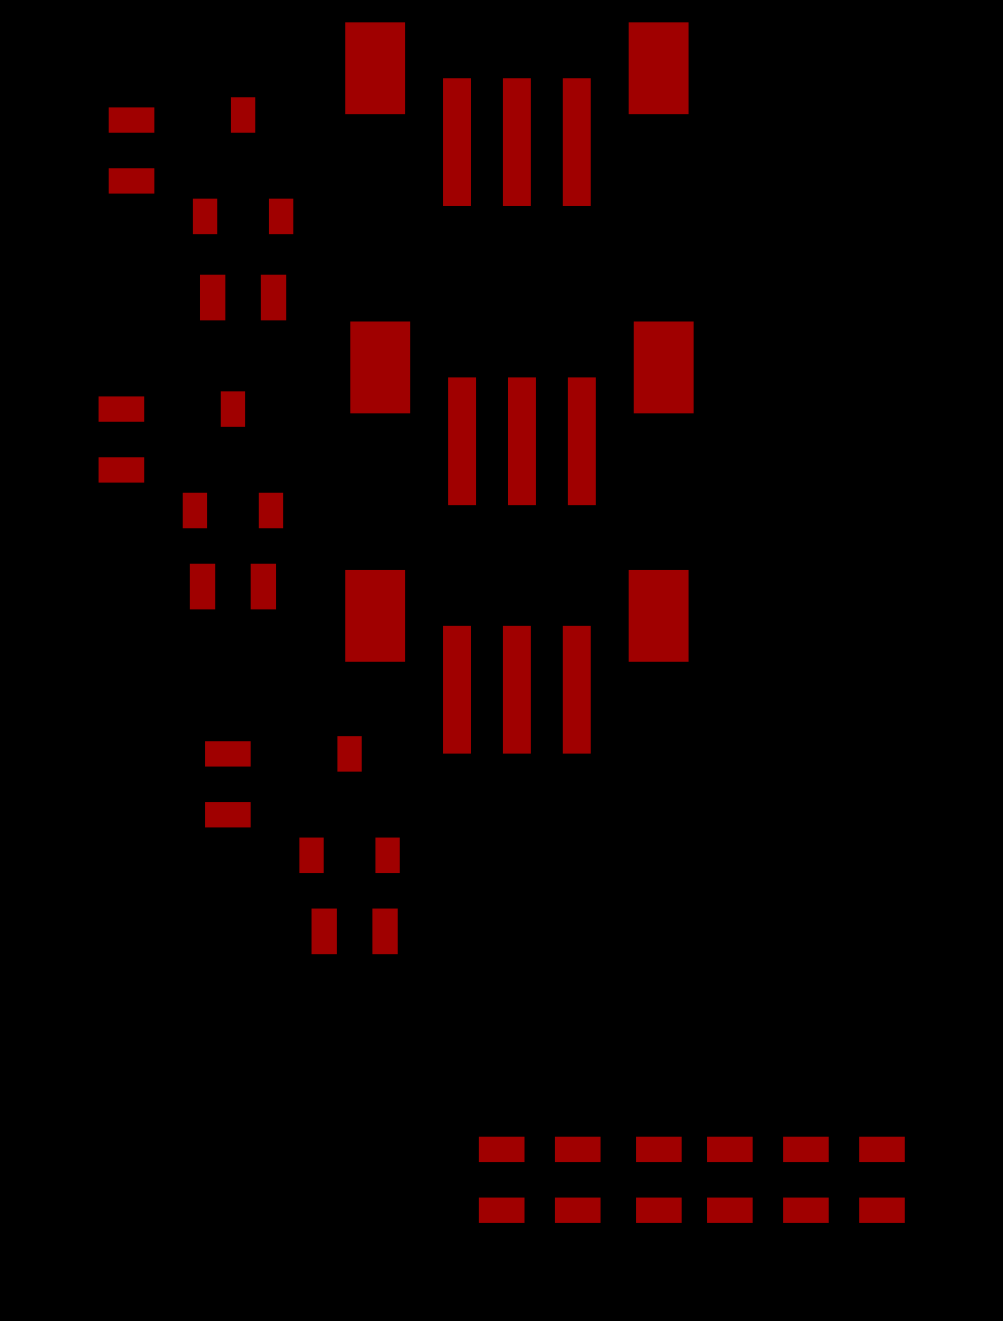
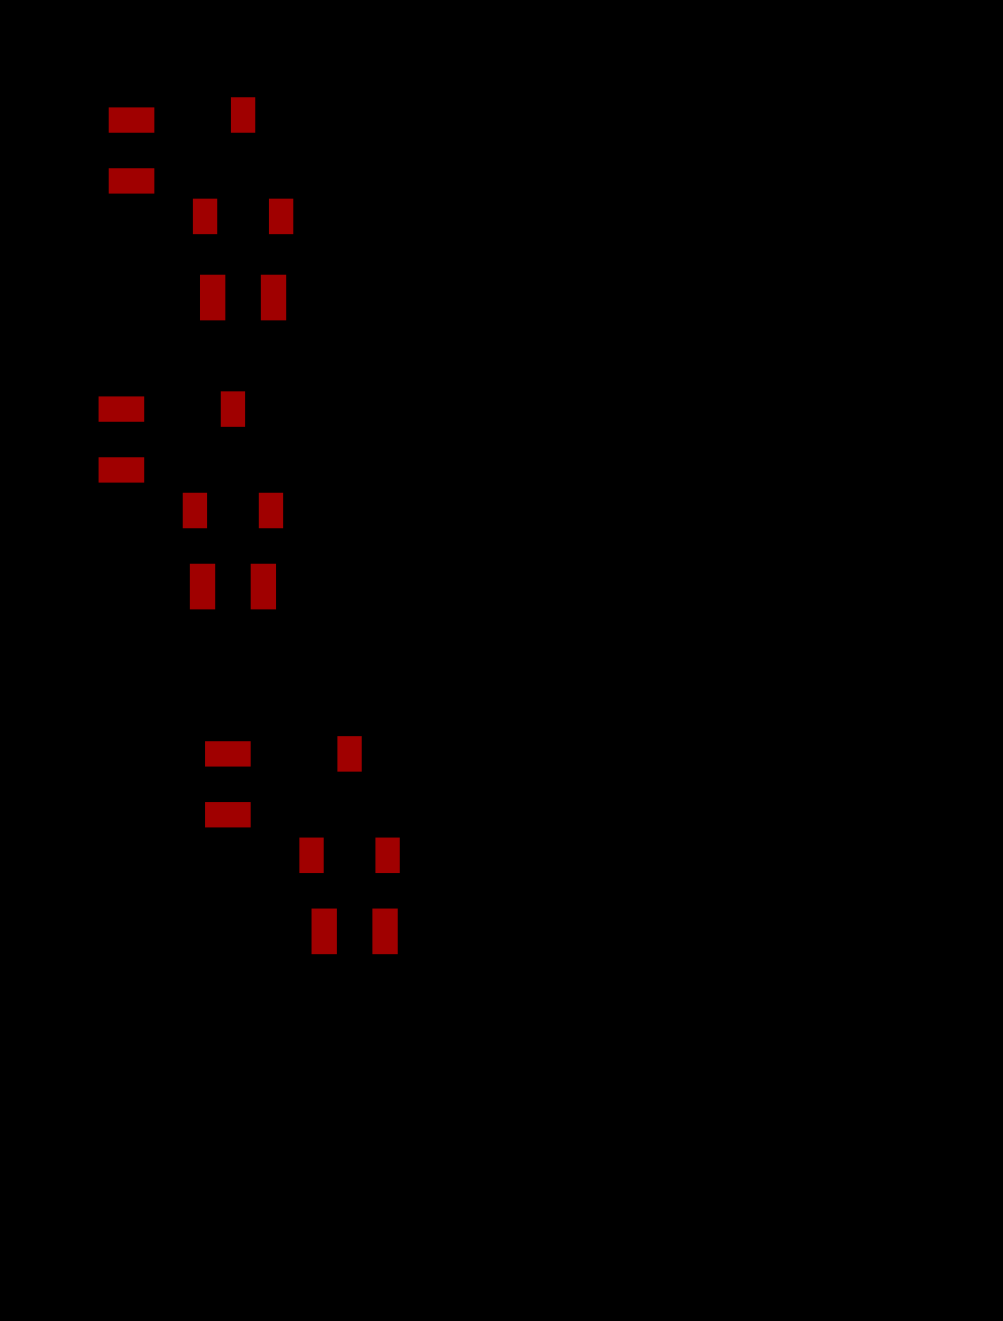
part: (516, 114) -> none
part: (521, 413) -> none
part: (516, 661) -> none
part: (501, 1179) -> none
part: (577, 1179) -> none
part: (658, 1179) -> none
part: (729, 1179) -> none
part: (805, 1179) -> none
part: (881, 1179) -> none

